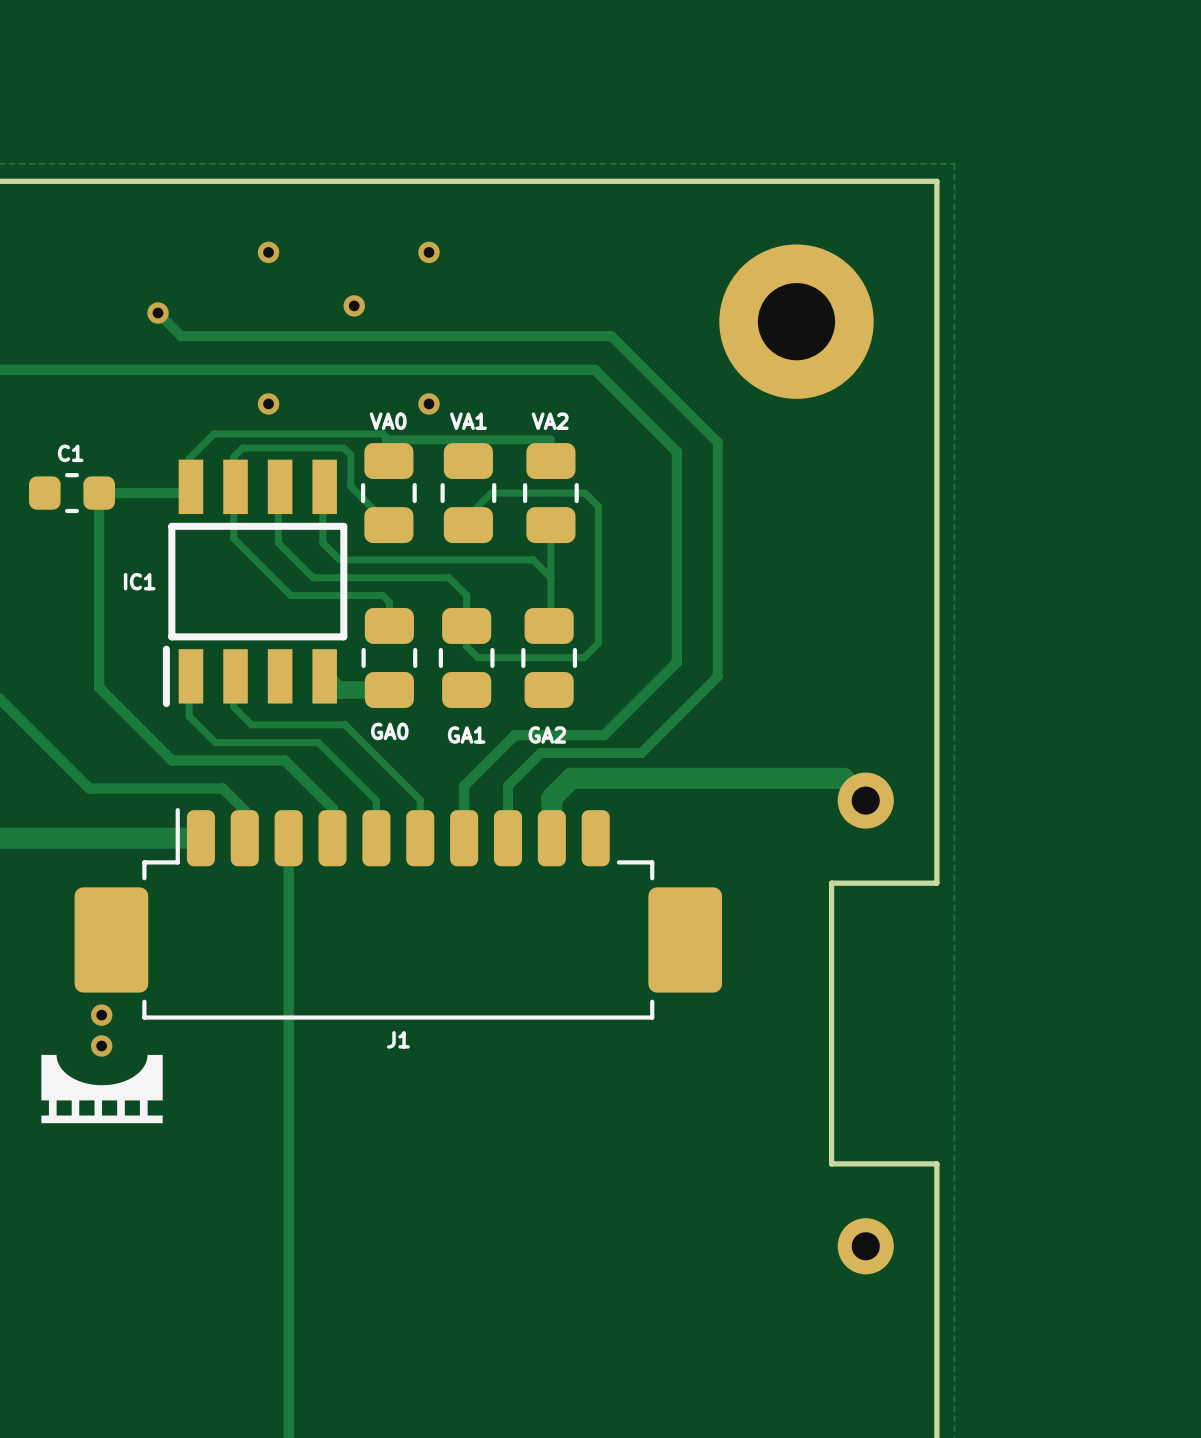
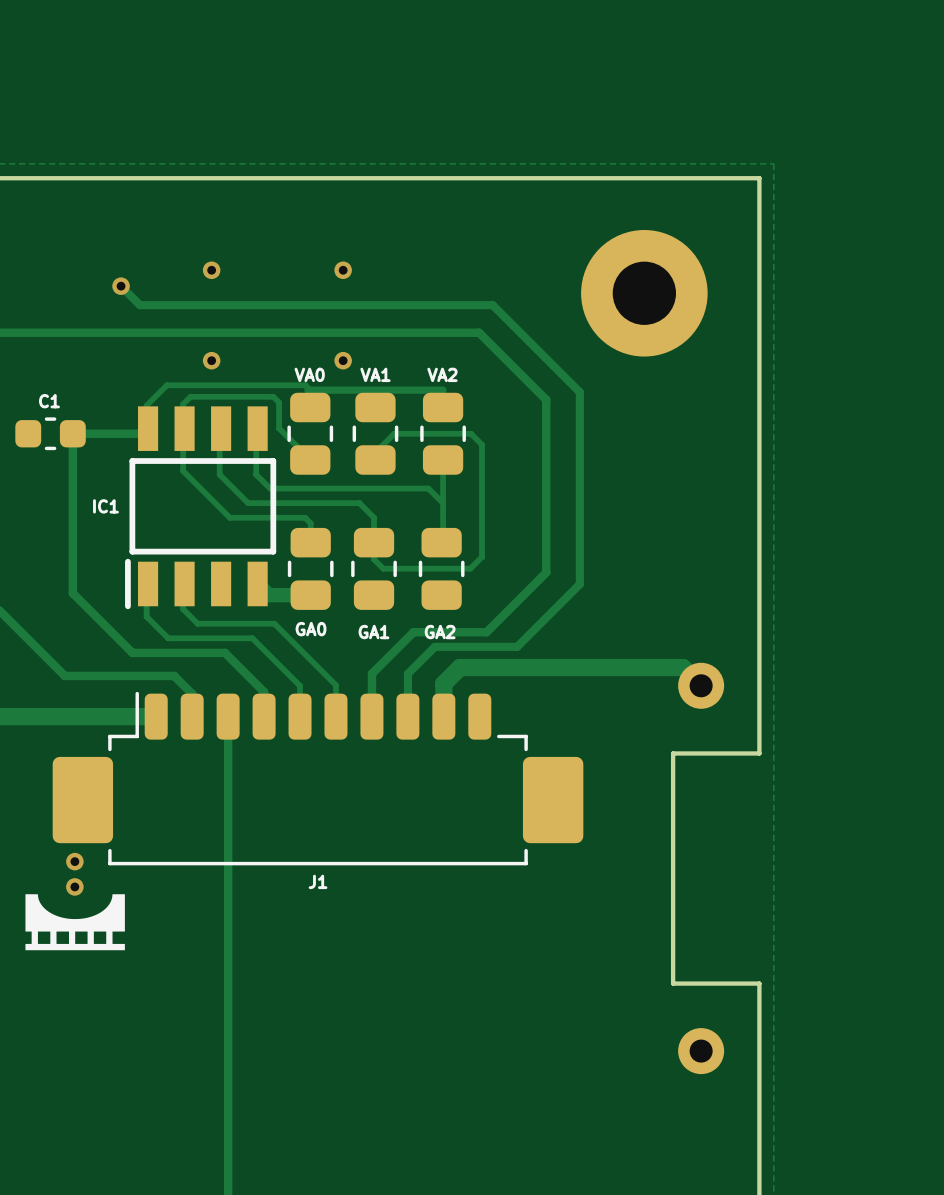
via position: (268, 252) -> (211, 270)
via: (429, 252) -> none
via: none -> (343, 270)
via: (354, 305) -> none

